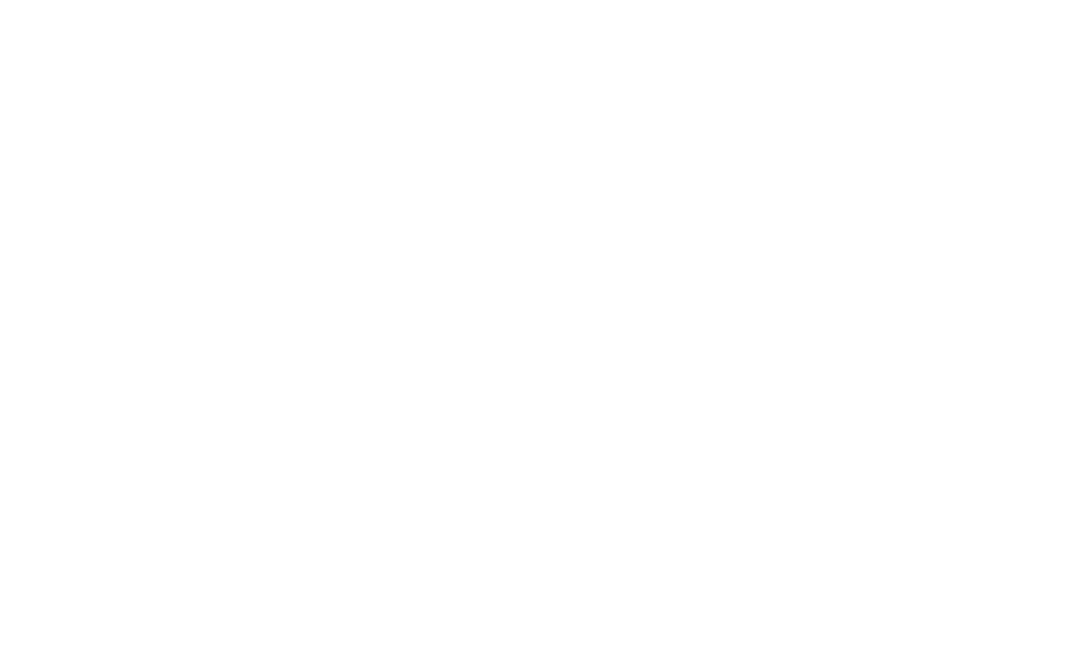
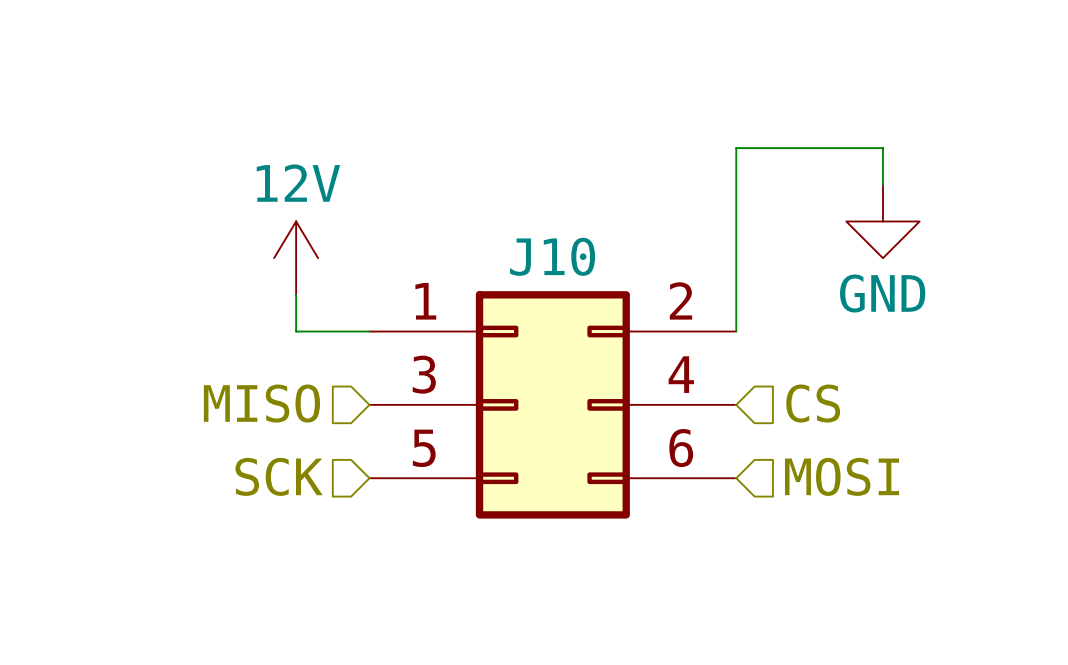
wire: none -> (882, 184) (882, 148) (736, 148) (736, 331)
power symbol: none -> GND (882, 221)
power symbol: none -> 12V (296, 258)
wire: none -> (296, 294) (296, 331) (369, 331)
hierarchical label: none -> MISO (261, 403)
hierarchical label: none -> CS (813, 403)
J10: none -> (552, 404)
hierarchical label: none -> SCK (279, 476)
hierarchical label: none -> MOSI (842, 476)

